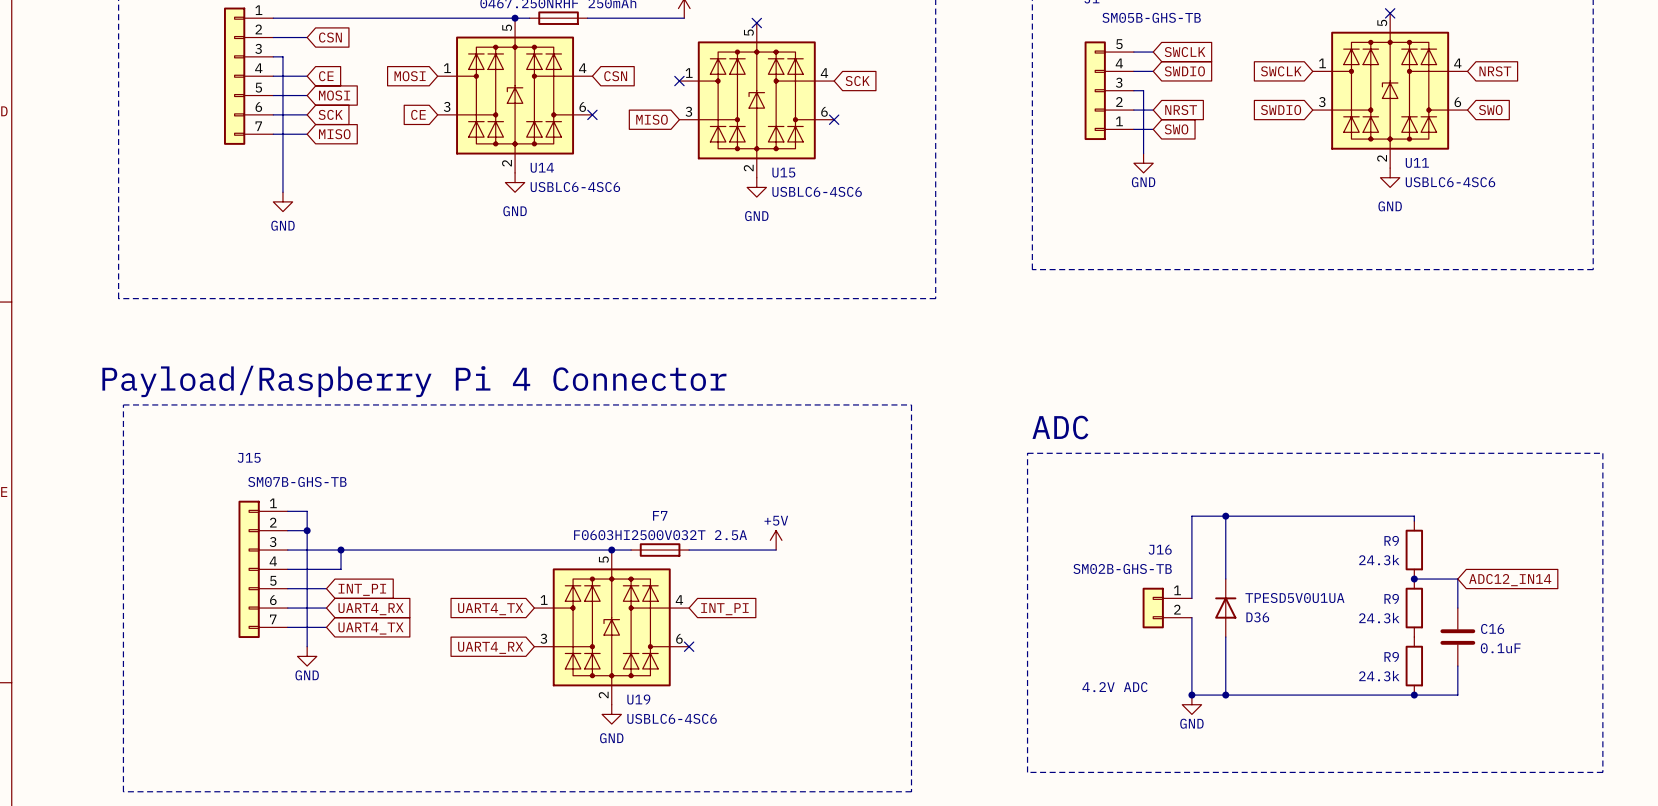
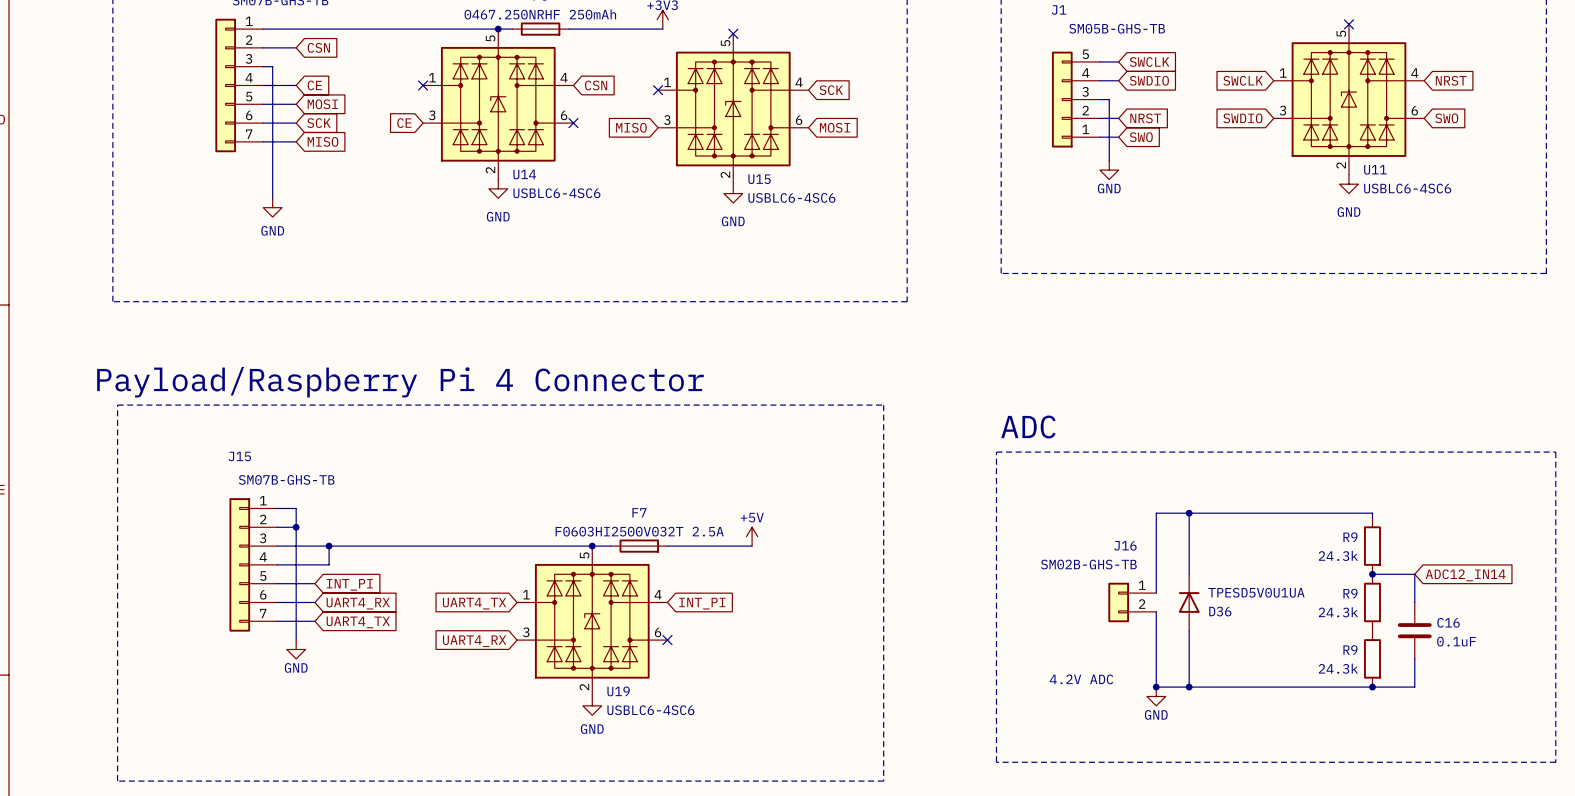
global label: MOSI (410, 76) -> none
no-connect mark: none -> (423, 85)
no-connect mark: (834, 119) -> none
global label: none -> MOSI (835, 127)

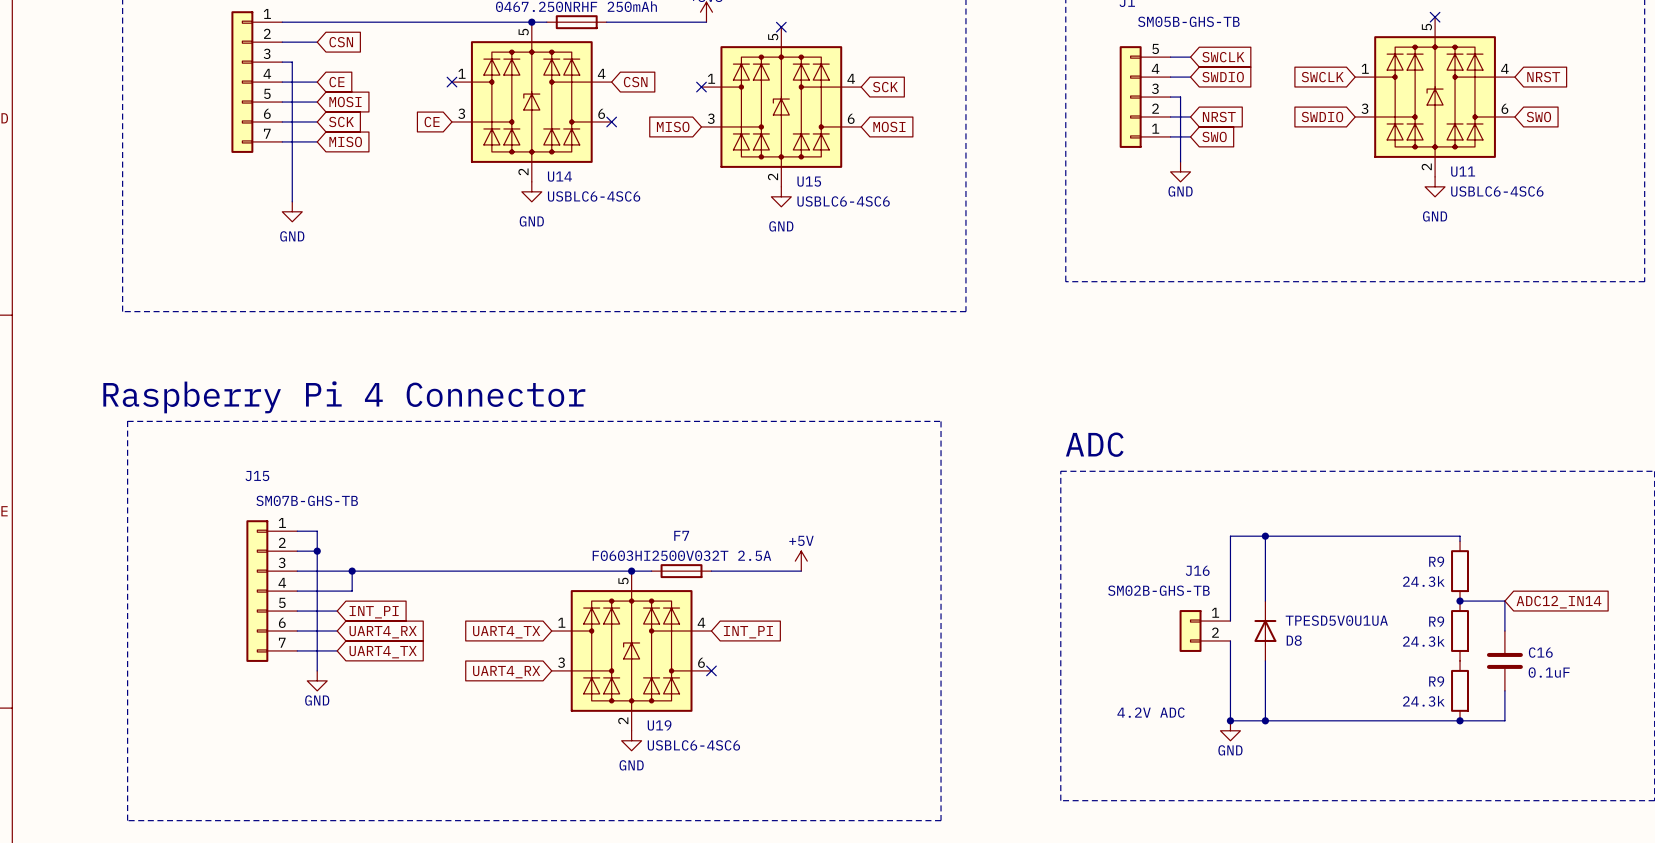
text: Payload/Raspberry Pi 4 Connector (400, 382) -> Raspberry Pi 4 Connector (344, 397)
D36 name: D36 (1220, 611) -> D8 (1294, 640)

